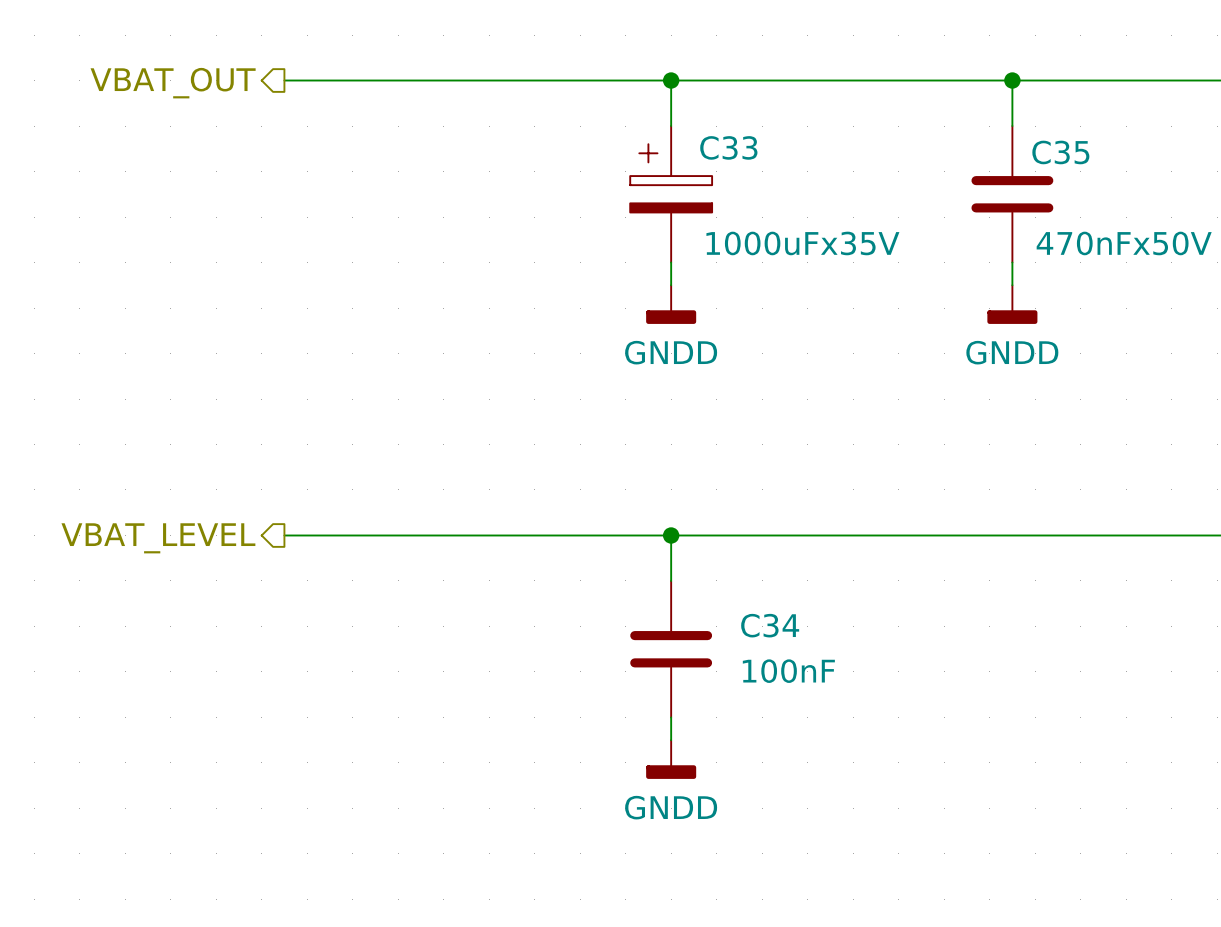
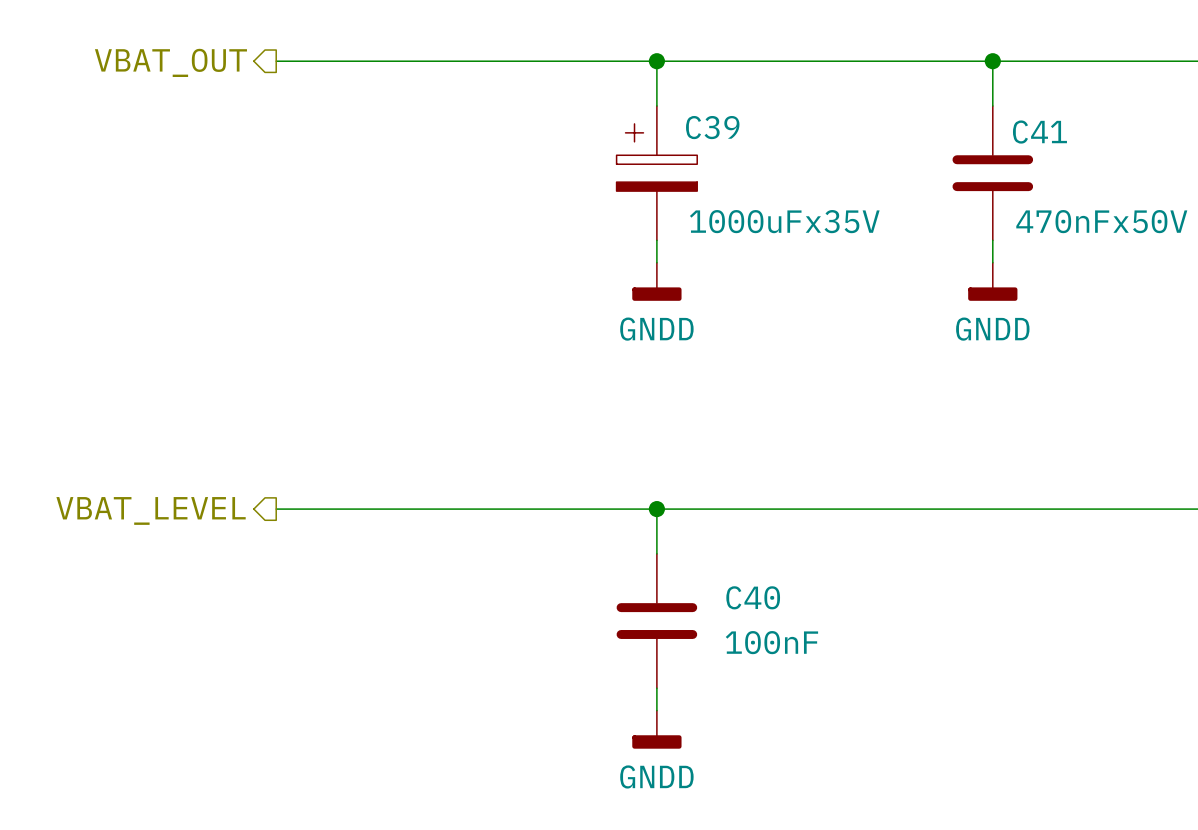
C33 name: C33 (728, 147) -> C39 (712, 127)
C35 name: C35 (1060, 152) -> C41 (1039, 132)
C34 name: C34 (770, 625) -> C40 (753, 597)

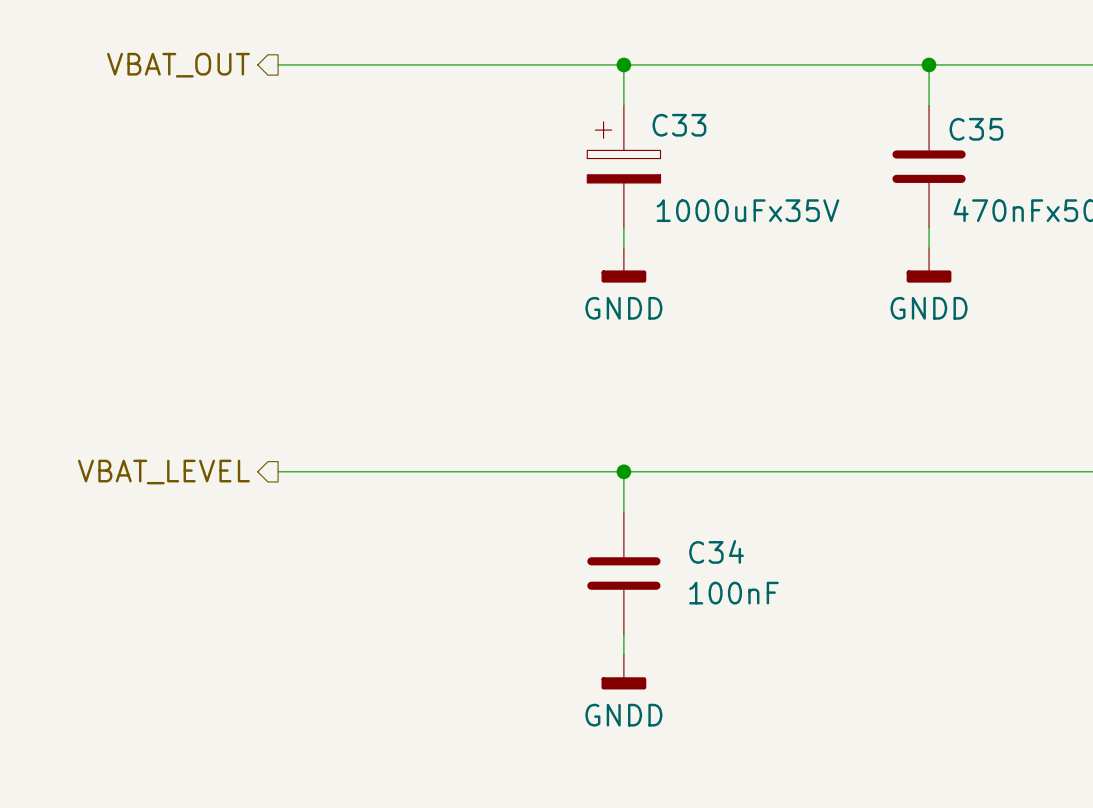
C39 name: C39 (712, 127) -> C33 (679, 125)
C41 name: C41 (1039, 132) -> C35 (976, 129)
C40 name: C40 (753, 597) -> C34 (716, 551)

